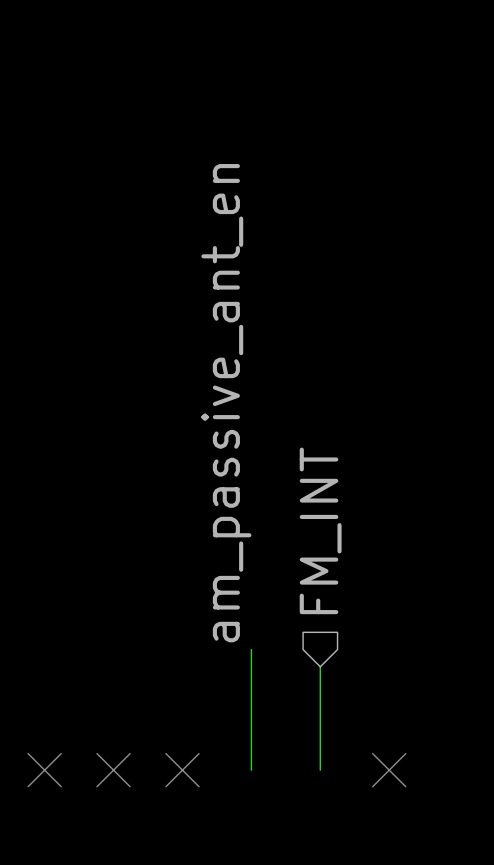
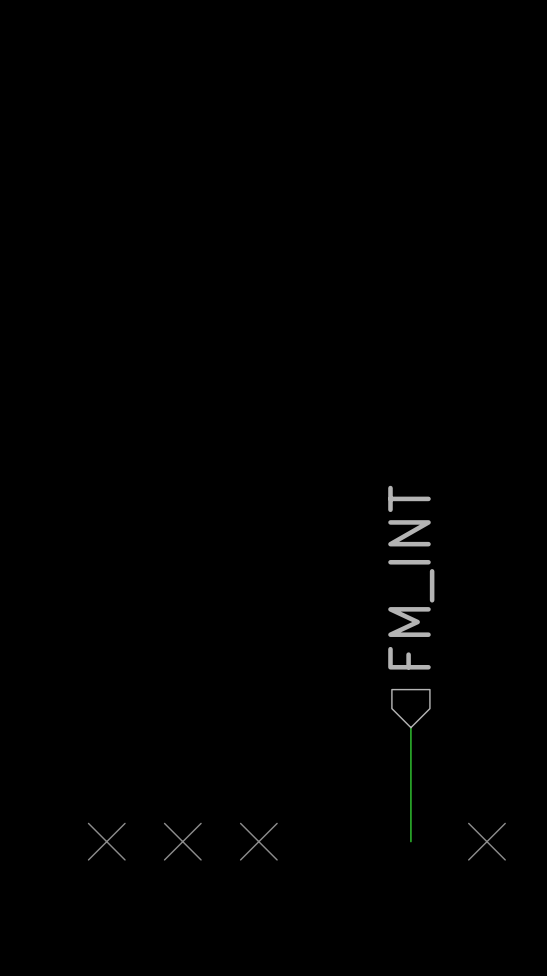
label: am_passive_ant_en (226, 403) -> none
wire: (251, 649) (251, 770) -> none

